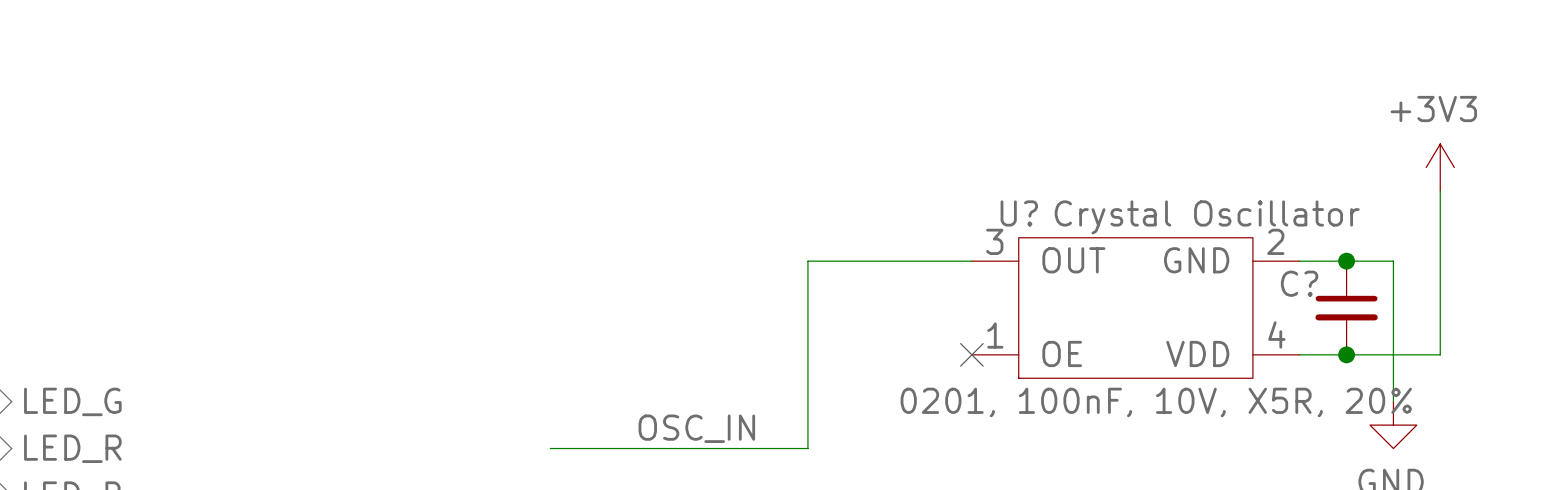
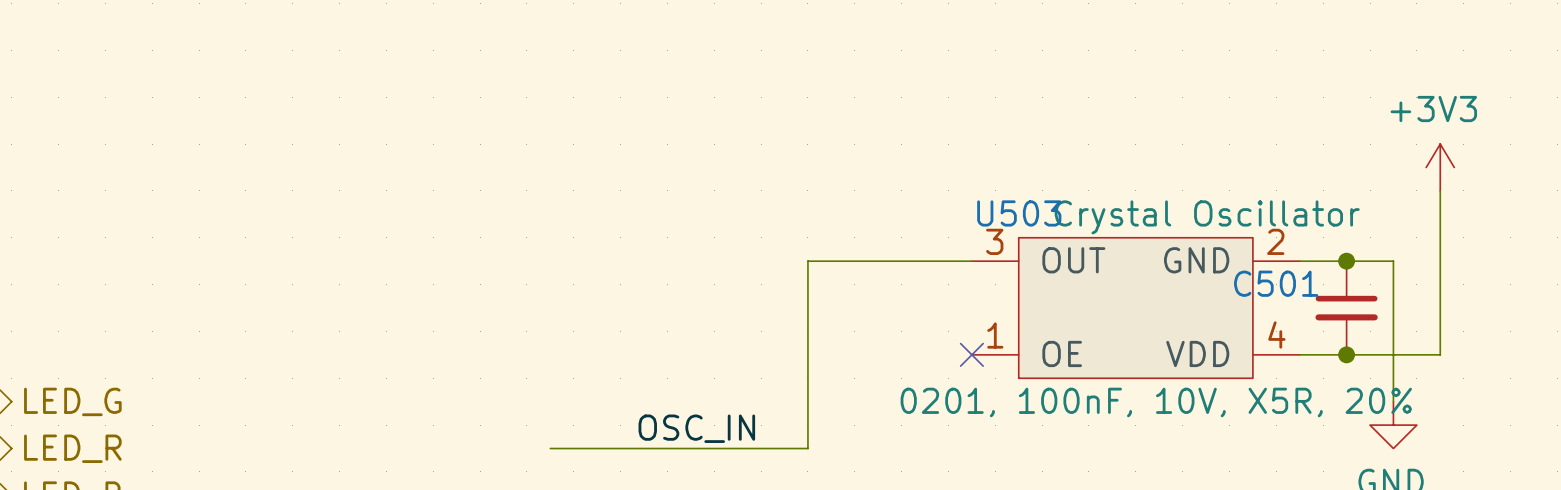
U? name: U? (1019, 213) -> U503 (1019, 213)
C? name: C? (1299, 283) -> C501 (1276, 283)

